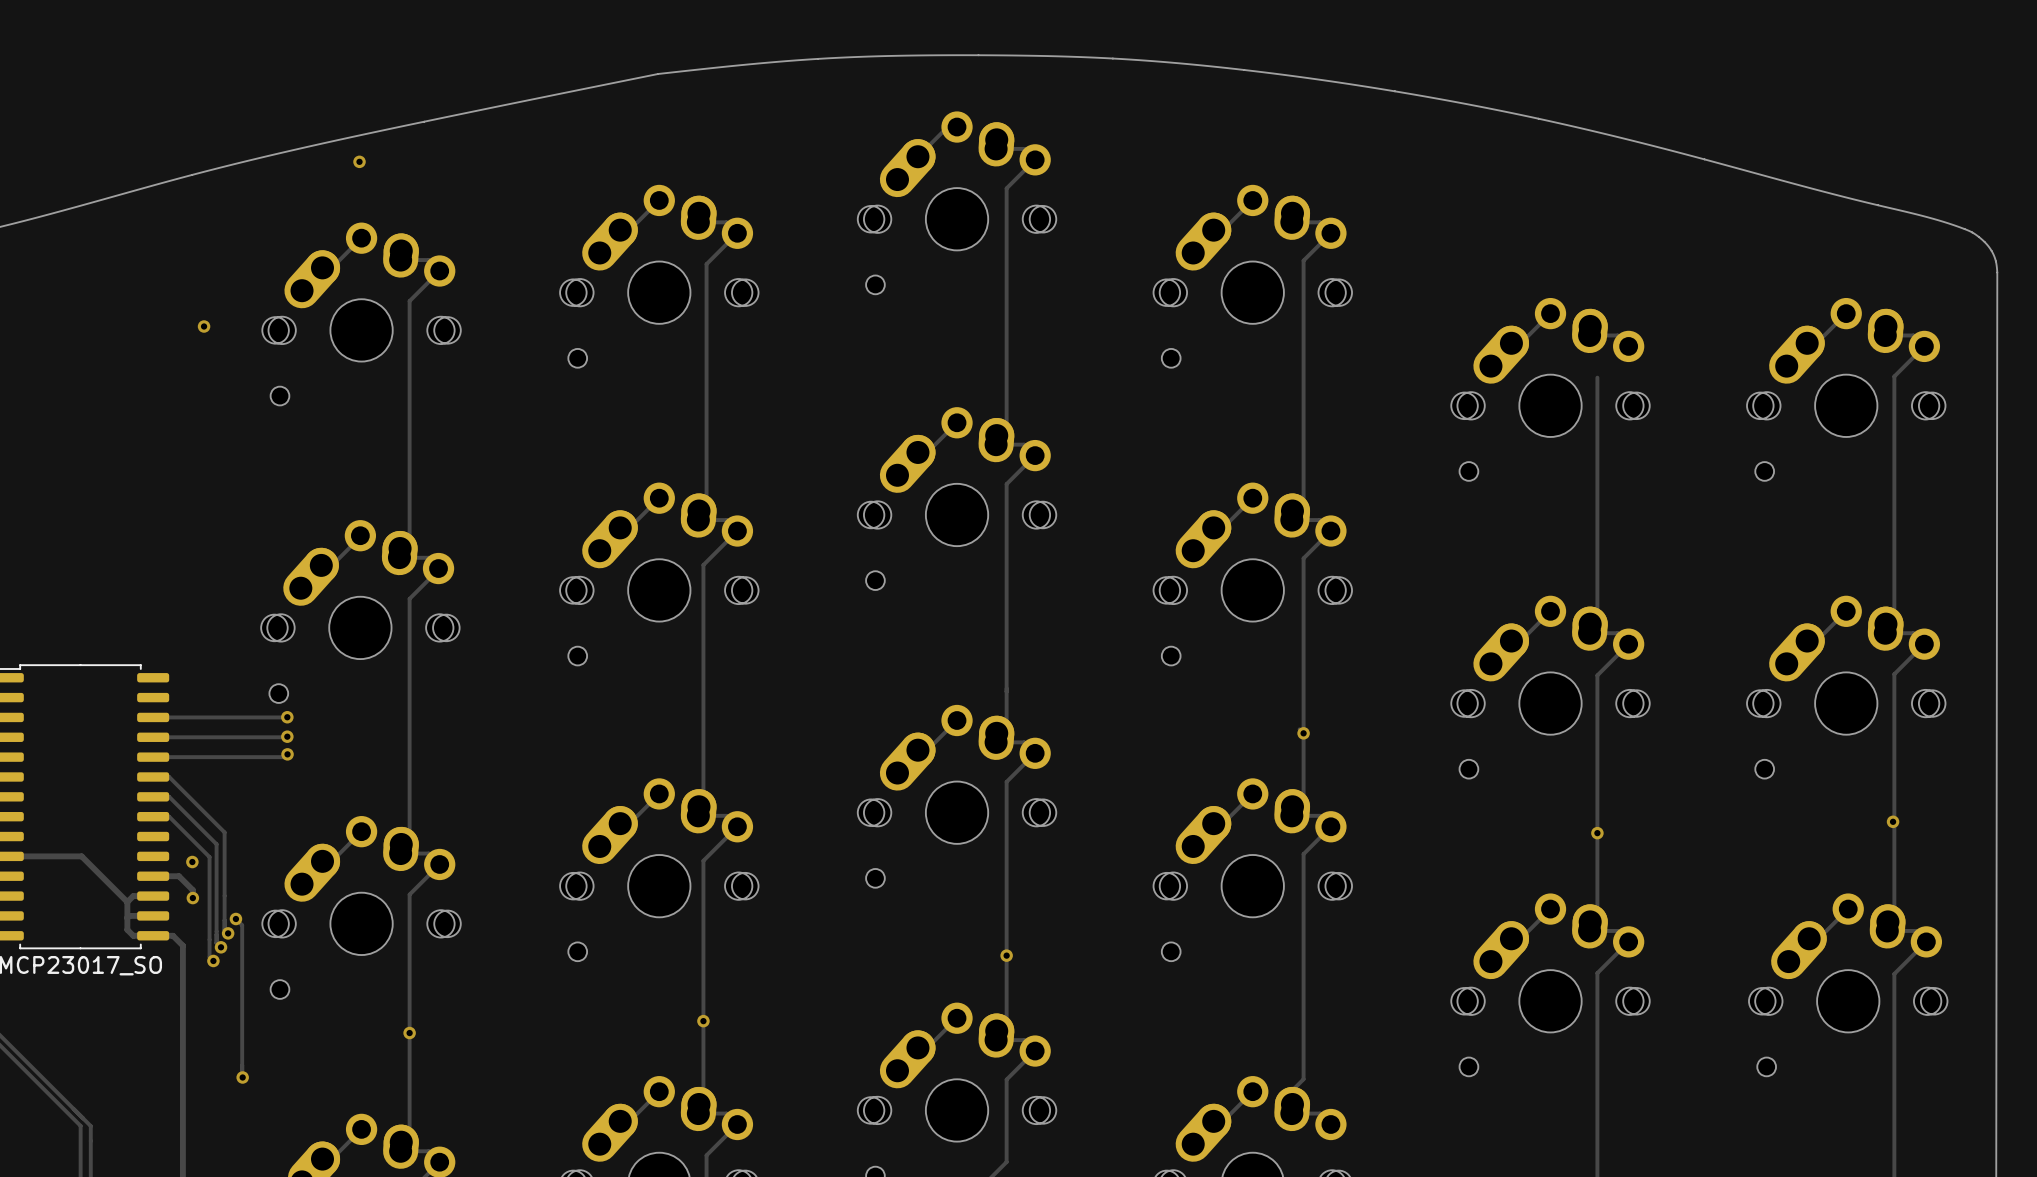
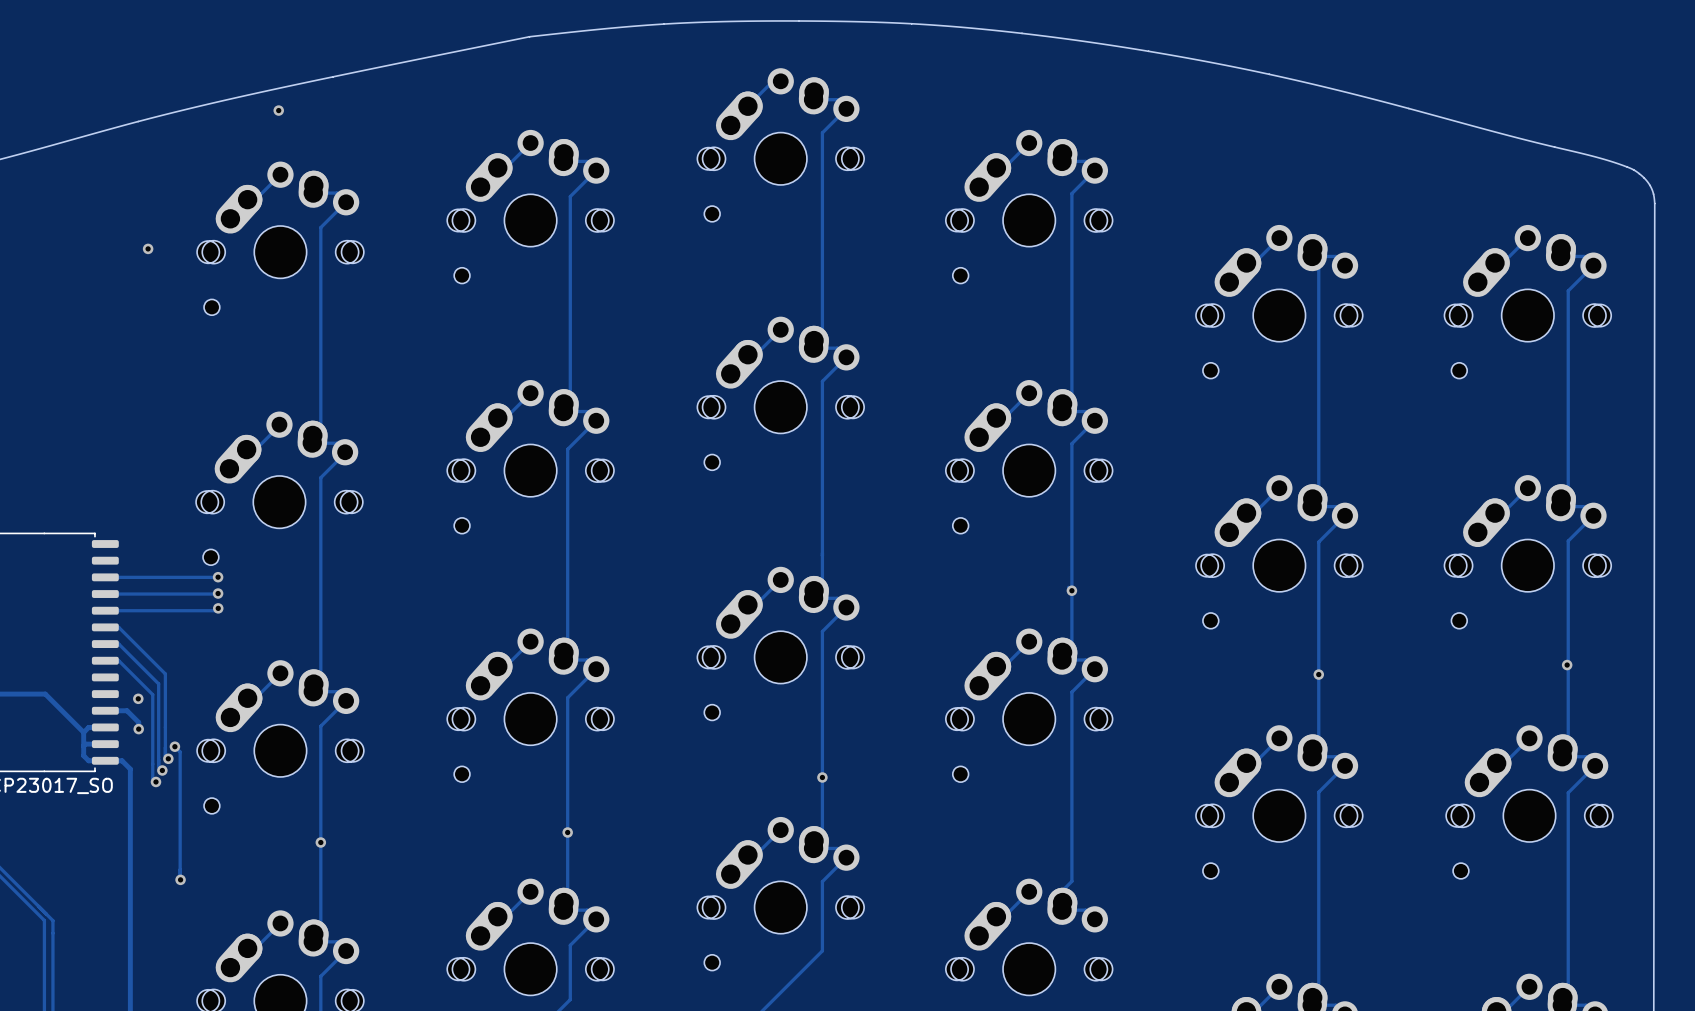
track: none -> (1312, 256) (1318, 263) (1318, 291)

